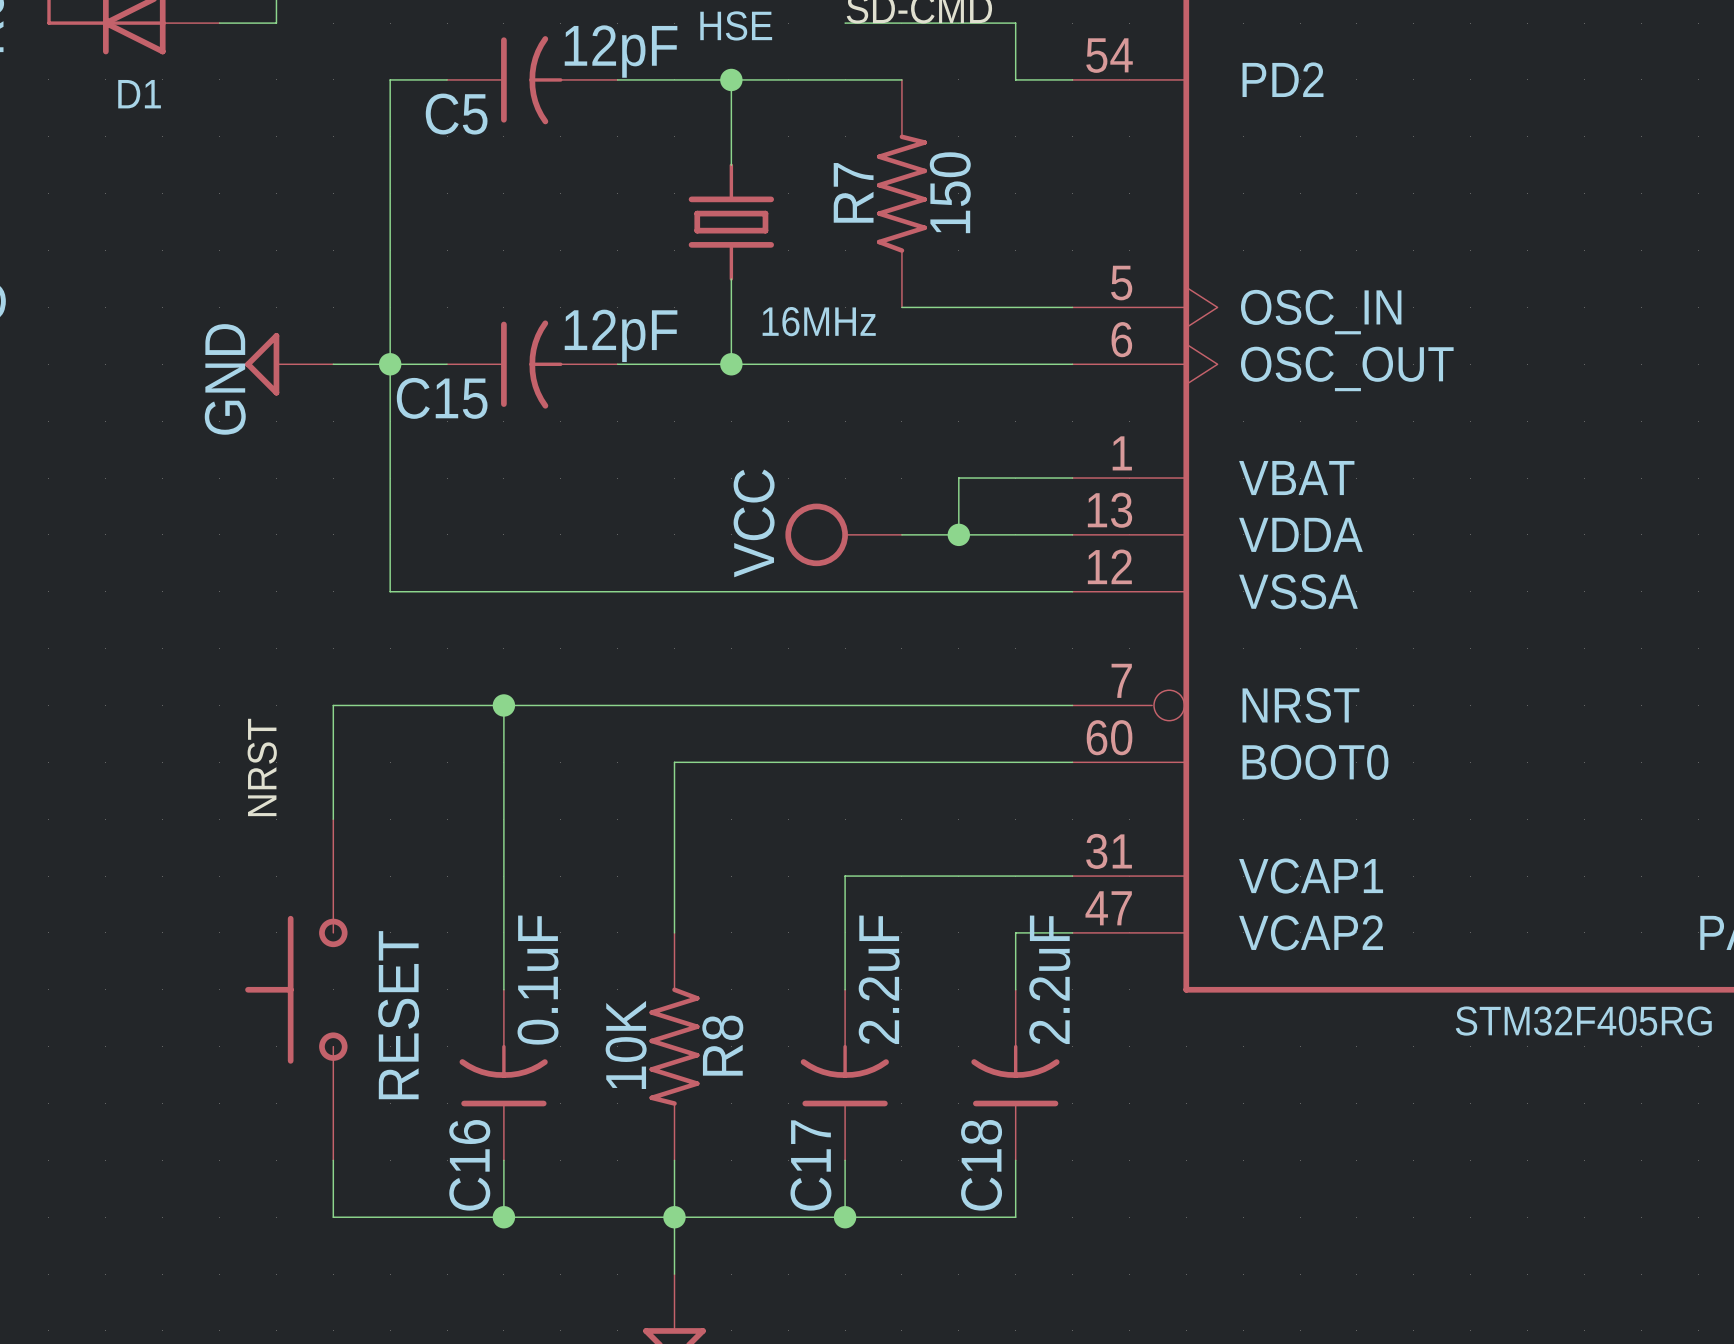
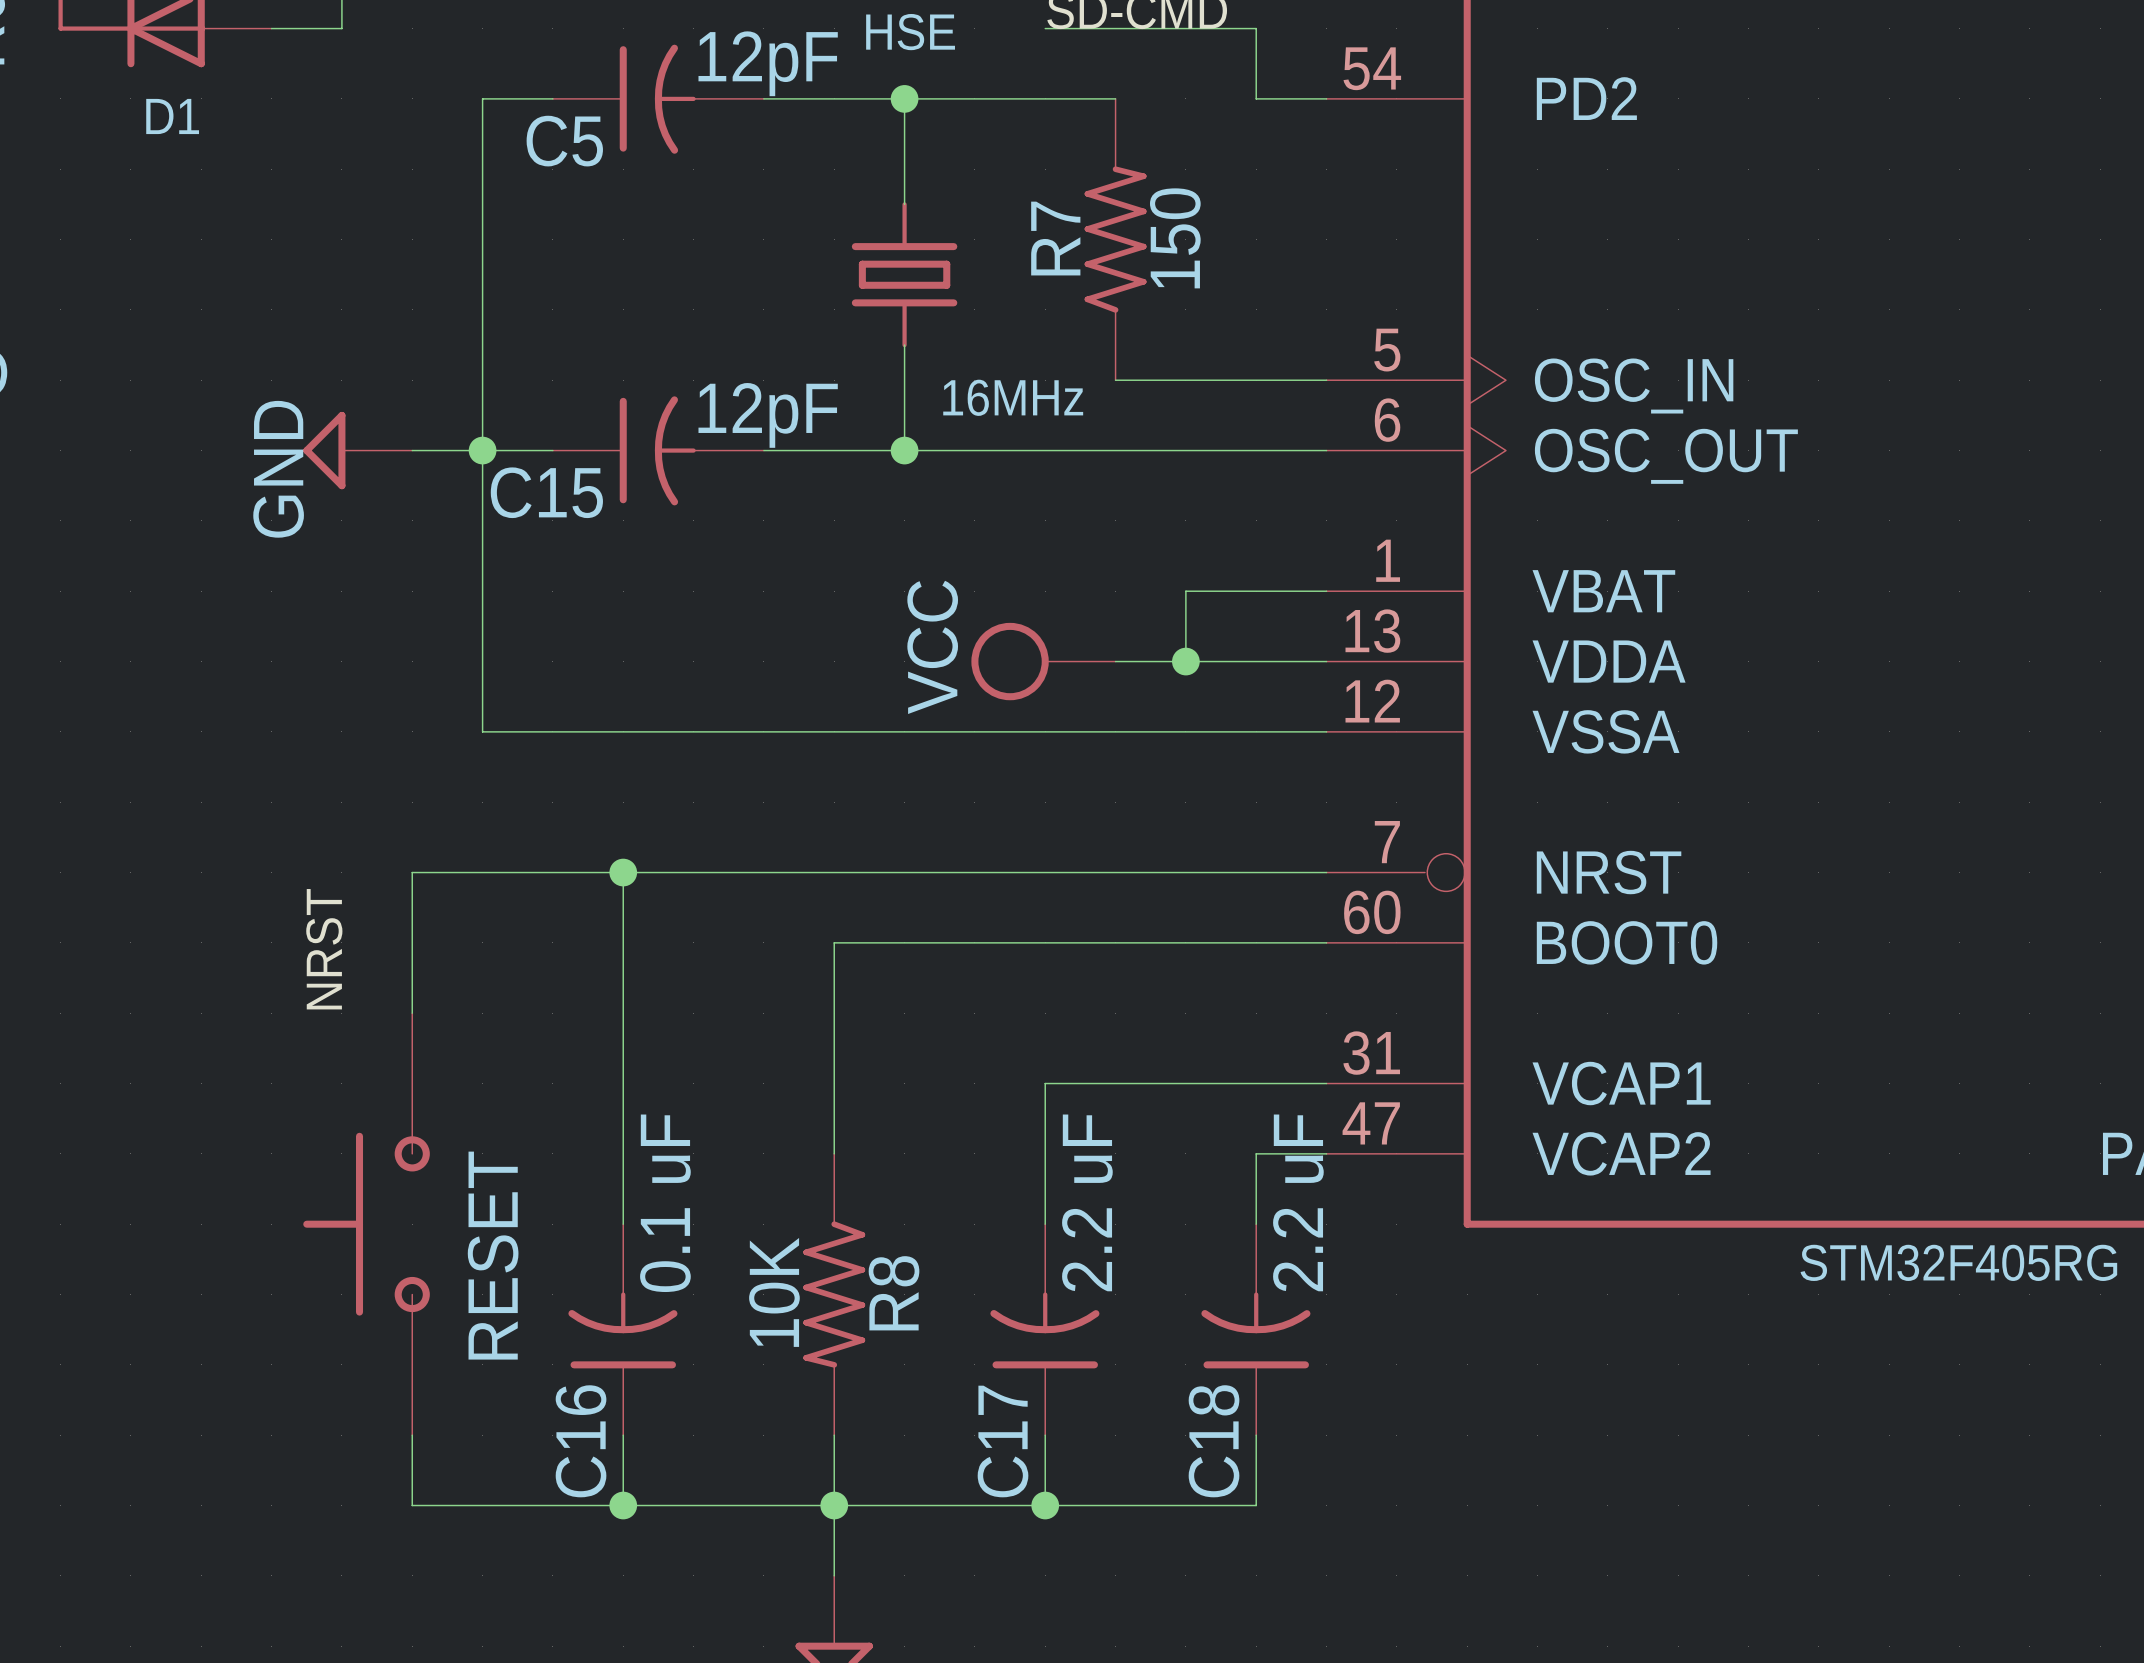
C17 value: 2.2uF (879, 979) -> 2.2 uF (1087, 1202)
C18 value: 2.2uF (1049, 979) -> 2.2 uF (1298, 1202)
C16 value: 0.1uF (538, 980) -> 0.1 uF (665, 1203)

